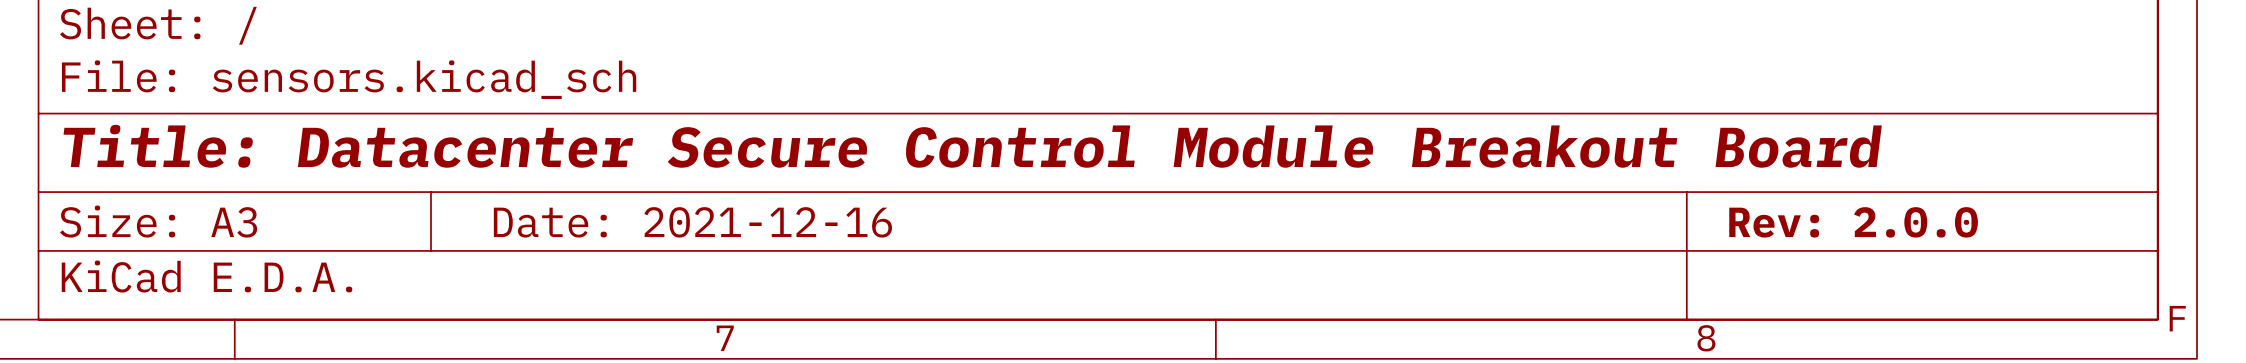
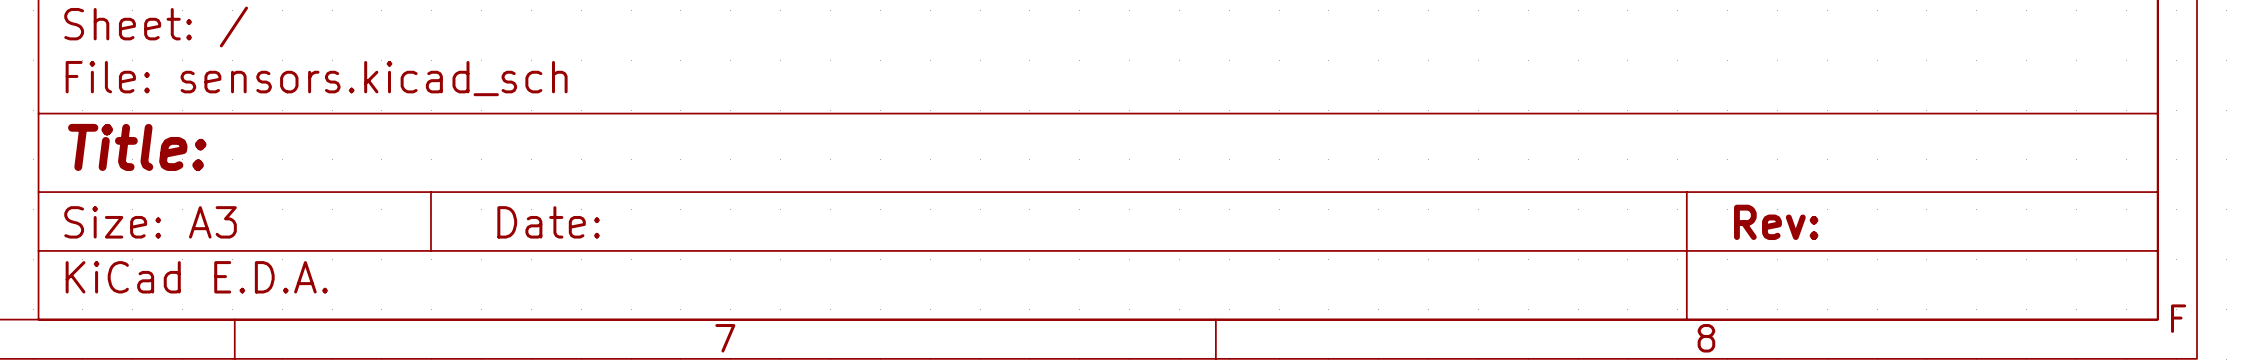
title block: Title: Datacenter Secure Control Module Breakout Board (972, 146) -> Title: (137, 147)
title block: Date: 2021-12-16 (692, 222) -> Date: (548, 222)
title block: Rev: 2.0.0 (1853, 222) -> Rev: (1776, 222)

